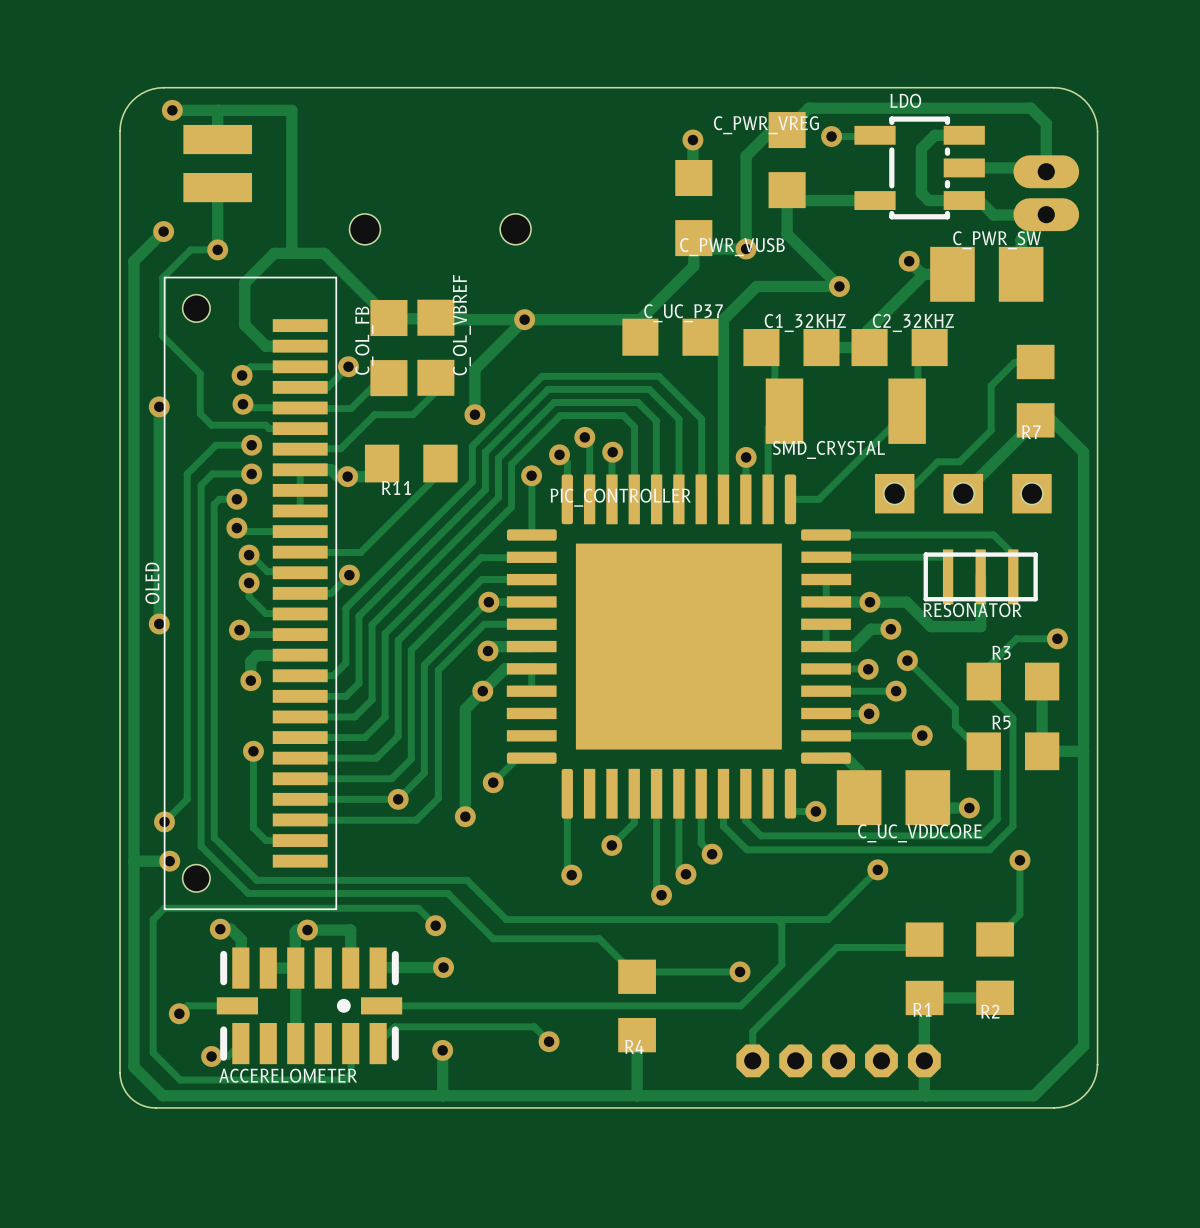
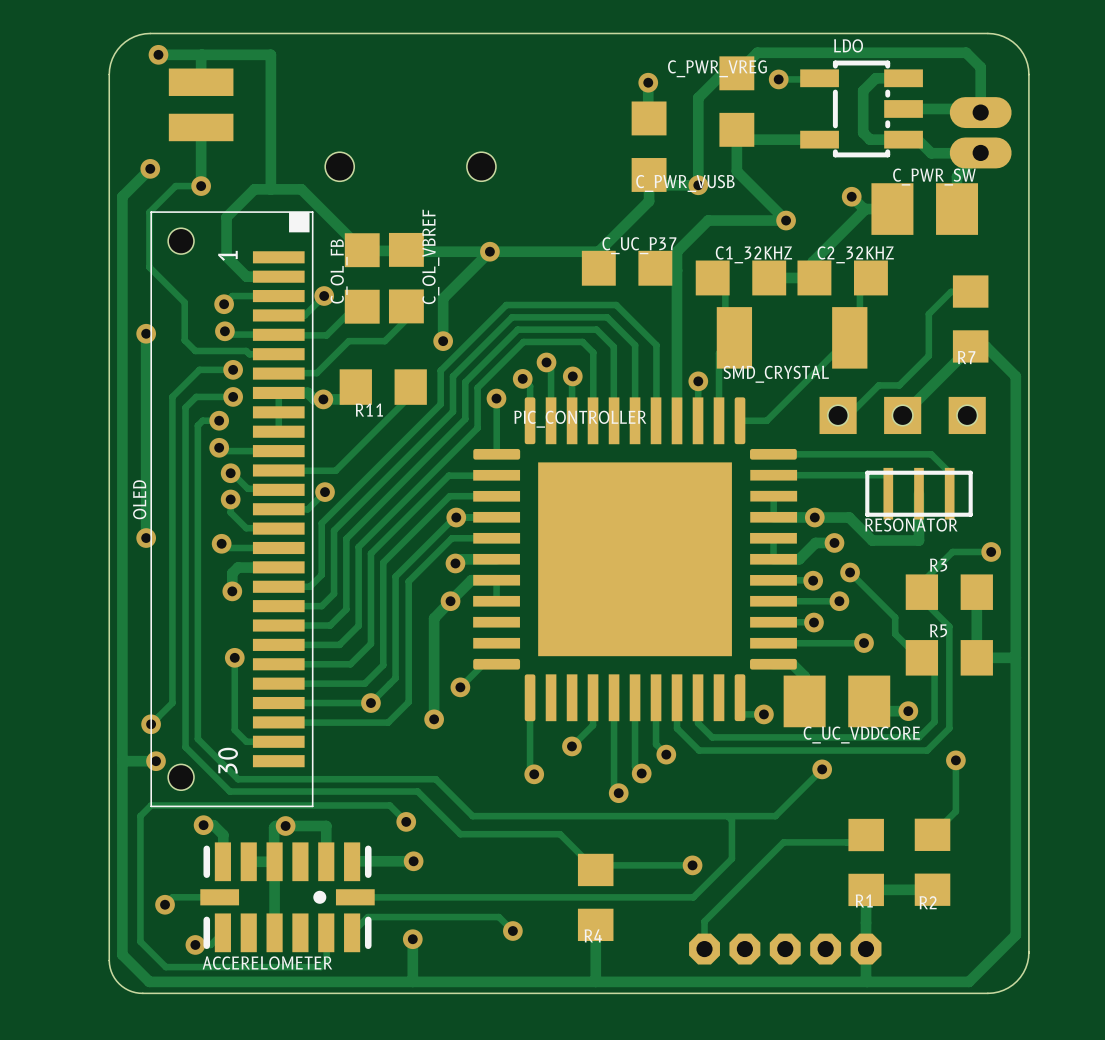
part footprint: [163, 276, 338, 911] -> [150, 211, 314, 808]

